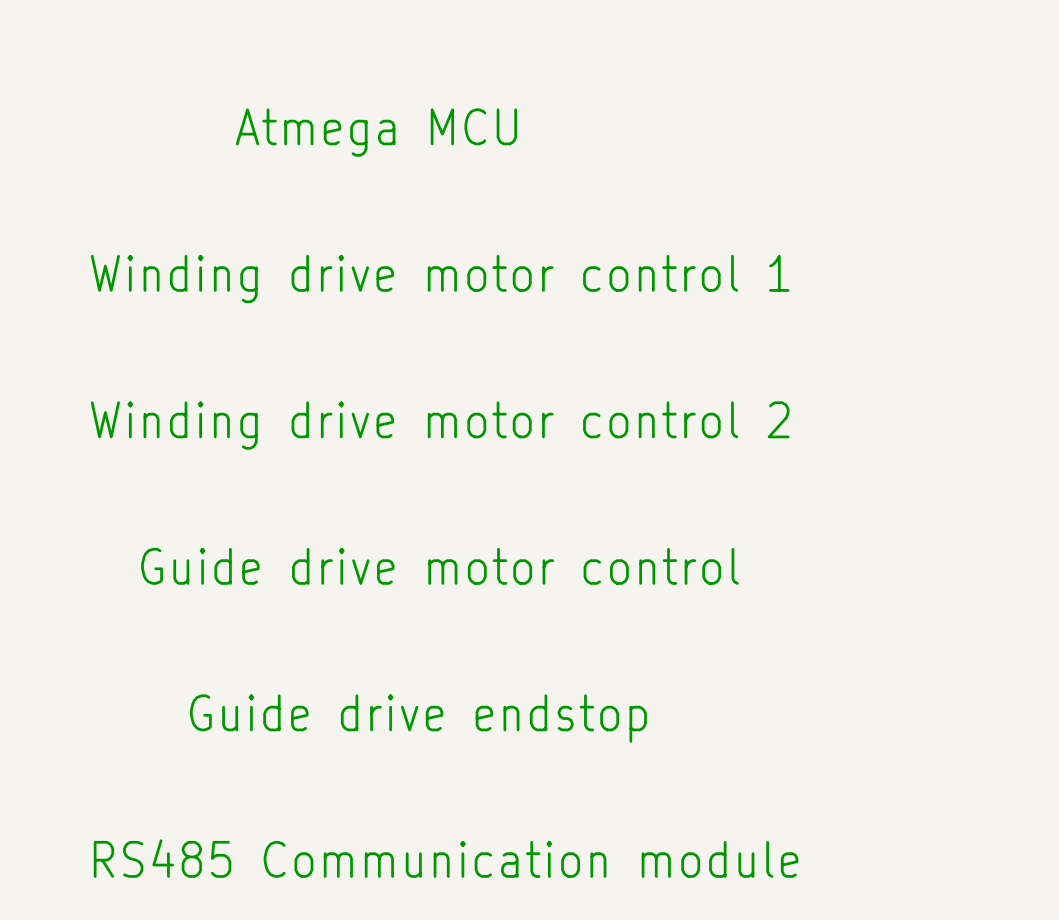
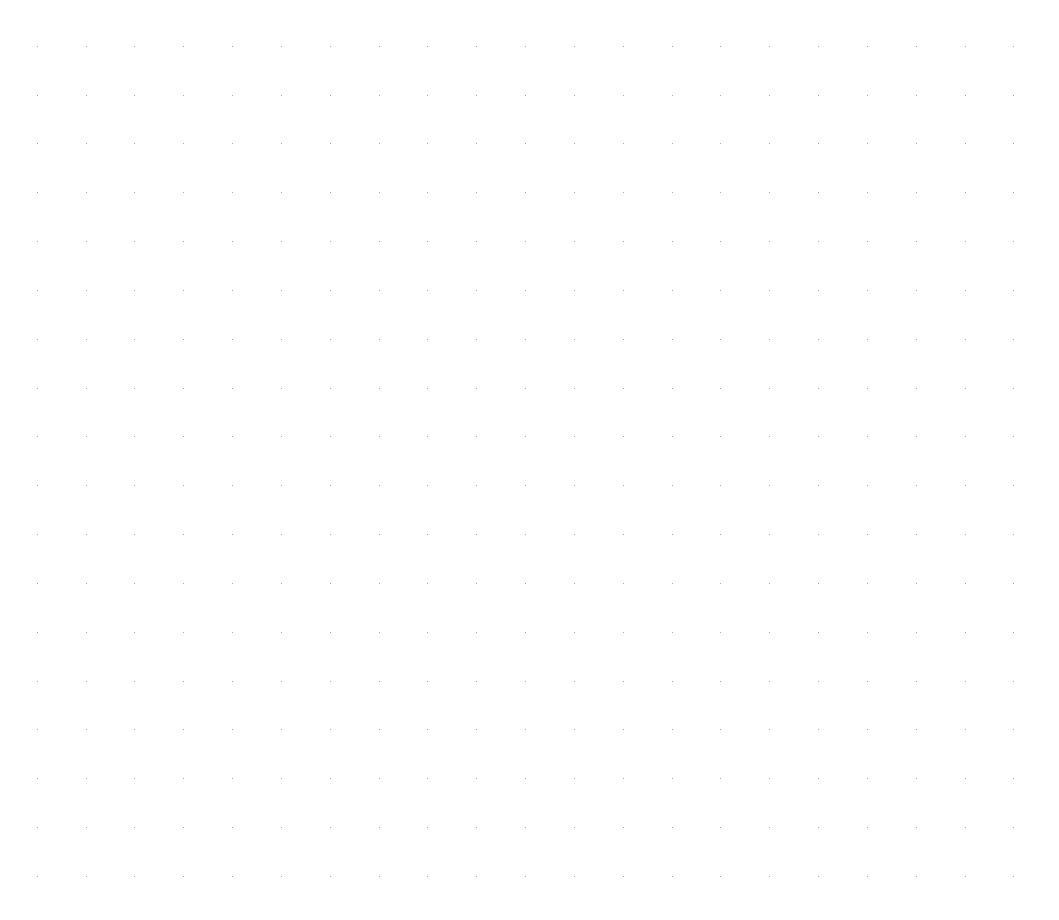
text: Atmega MCU (376, 132) -> none
text: Winding drive motor control 1 (440, 279) -> none
text: Winding drive motor control 2 (440, 425) -> none
text: Guide drive motor control (439, 566) -> none
text: Guide drive endstop (418, 718) -> none
text: RS485 Communication module (446, 858) -> none

